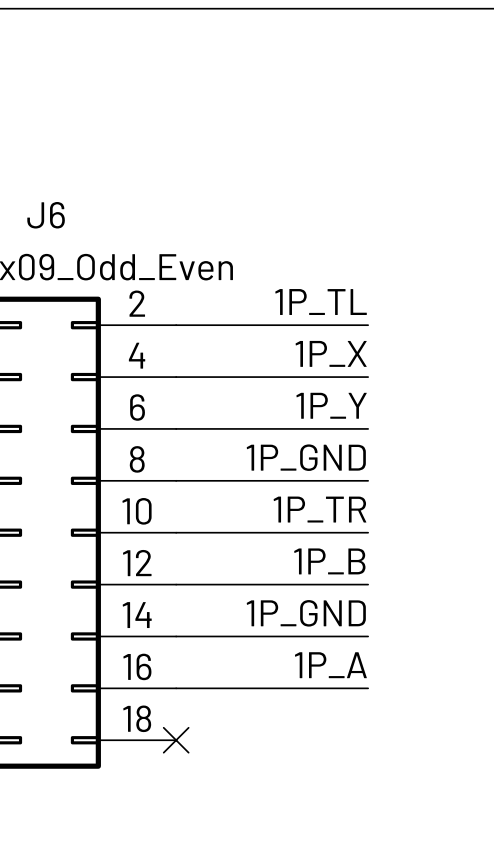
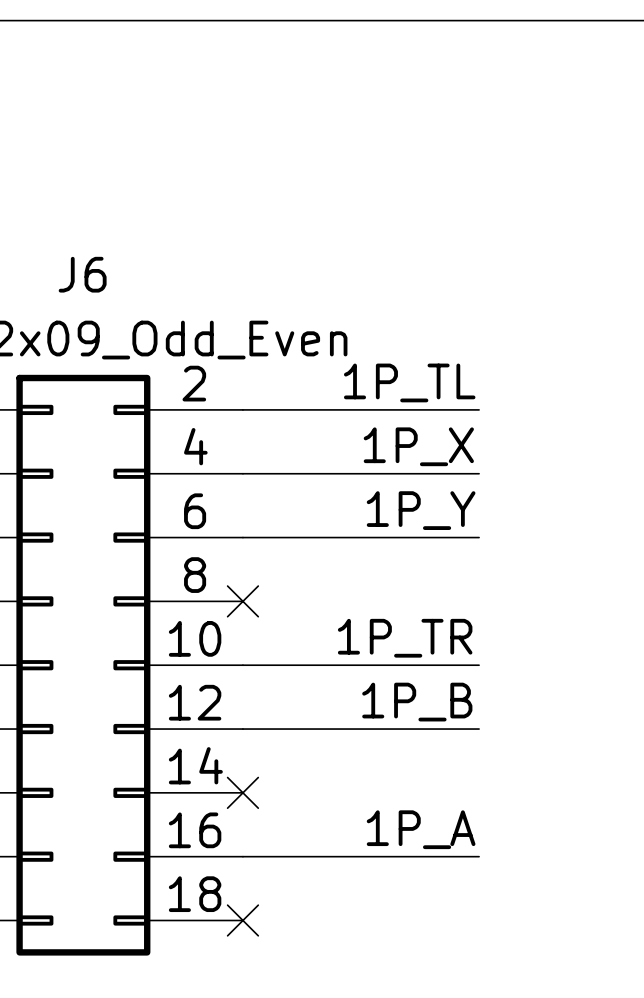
label: 1P_GND (306, 457) -> none
wire: (176, 480) (368, 480) -> none
no-connect mark: none -> (242, 601)
label: 1P_GND (306, 613) -> none
wire: (176, 636) (368, 636) -> none
no-connect mark: none -> (242, 792)

